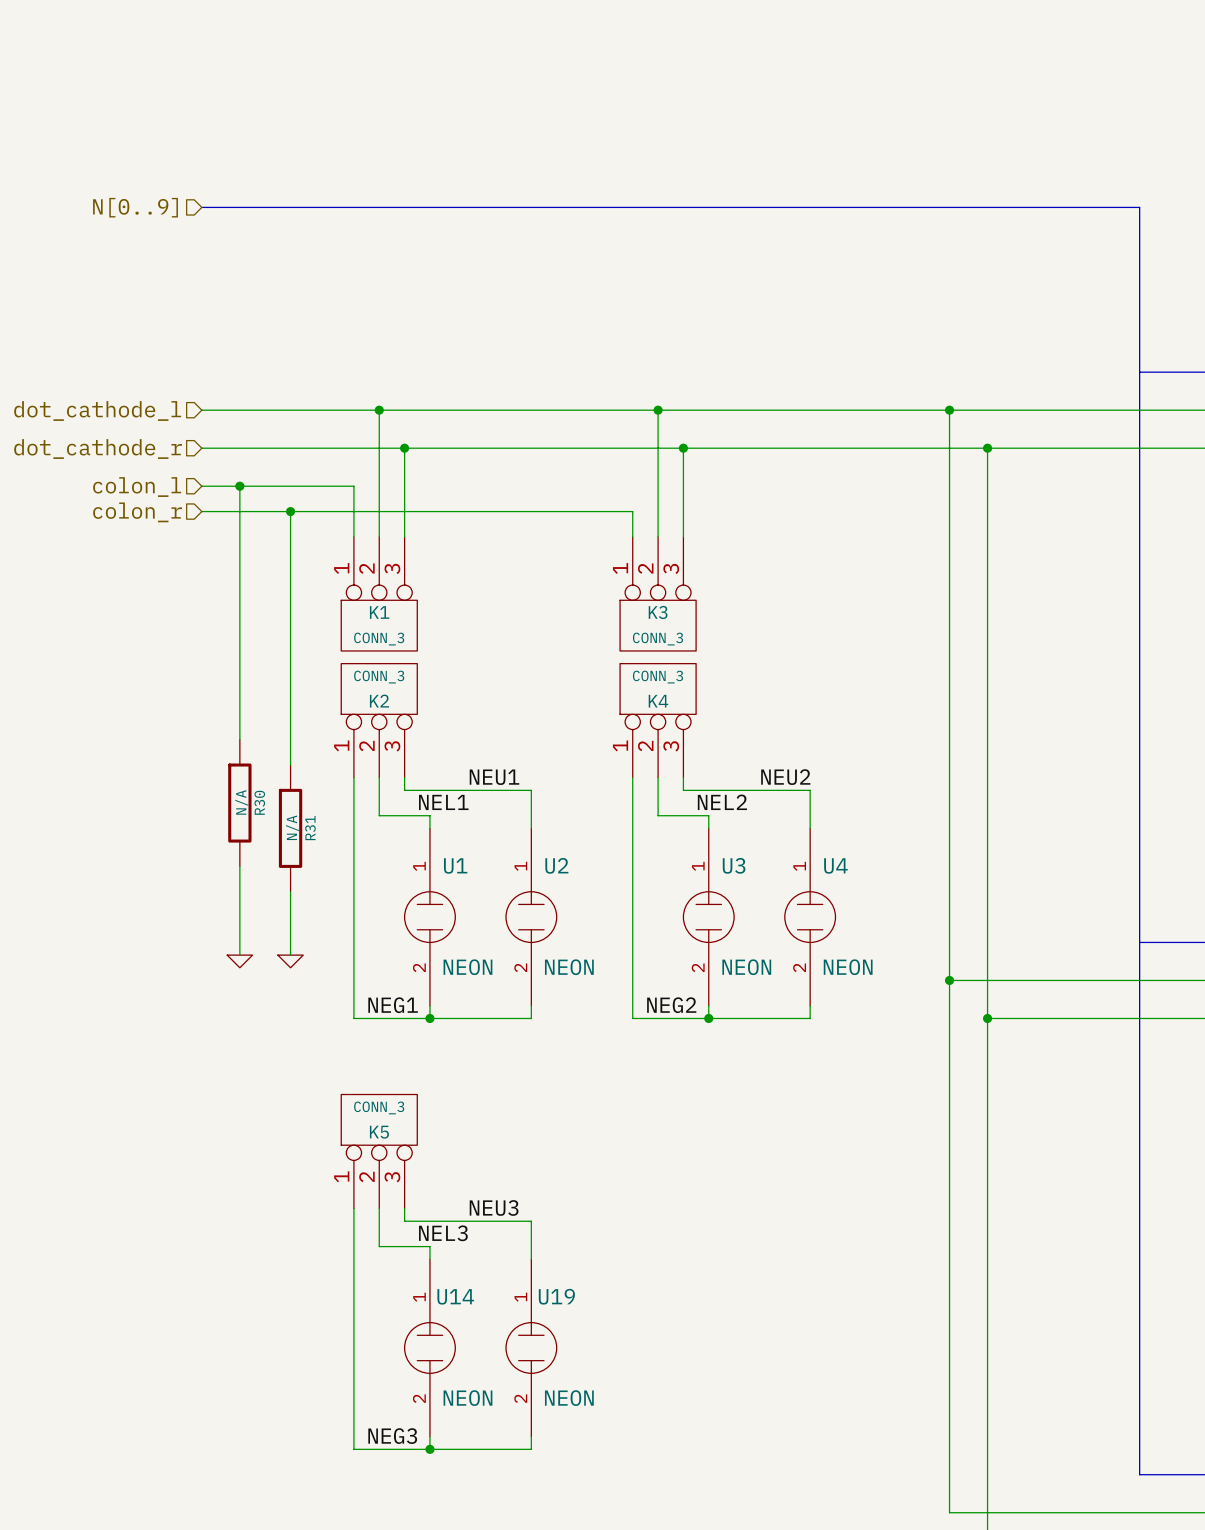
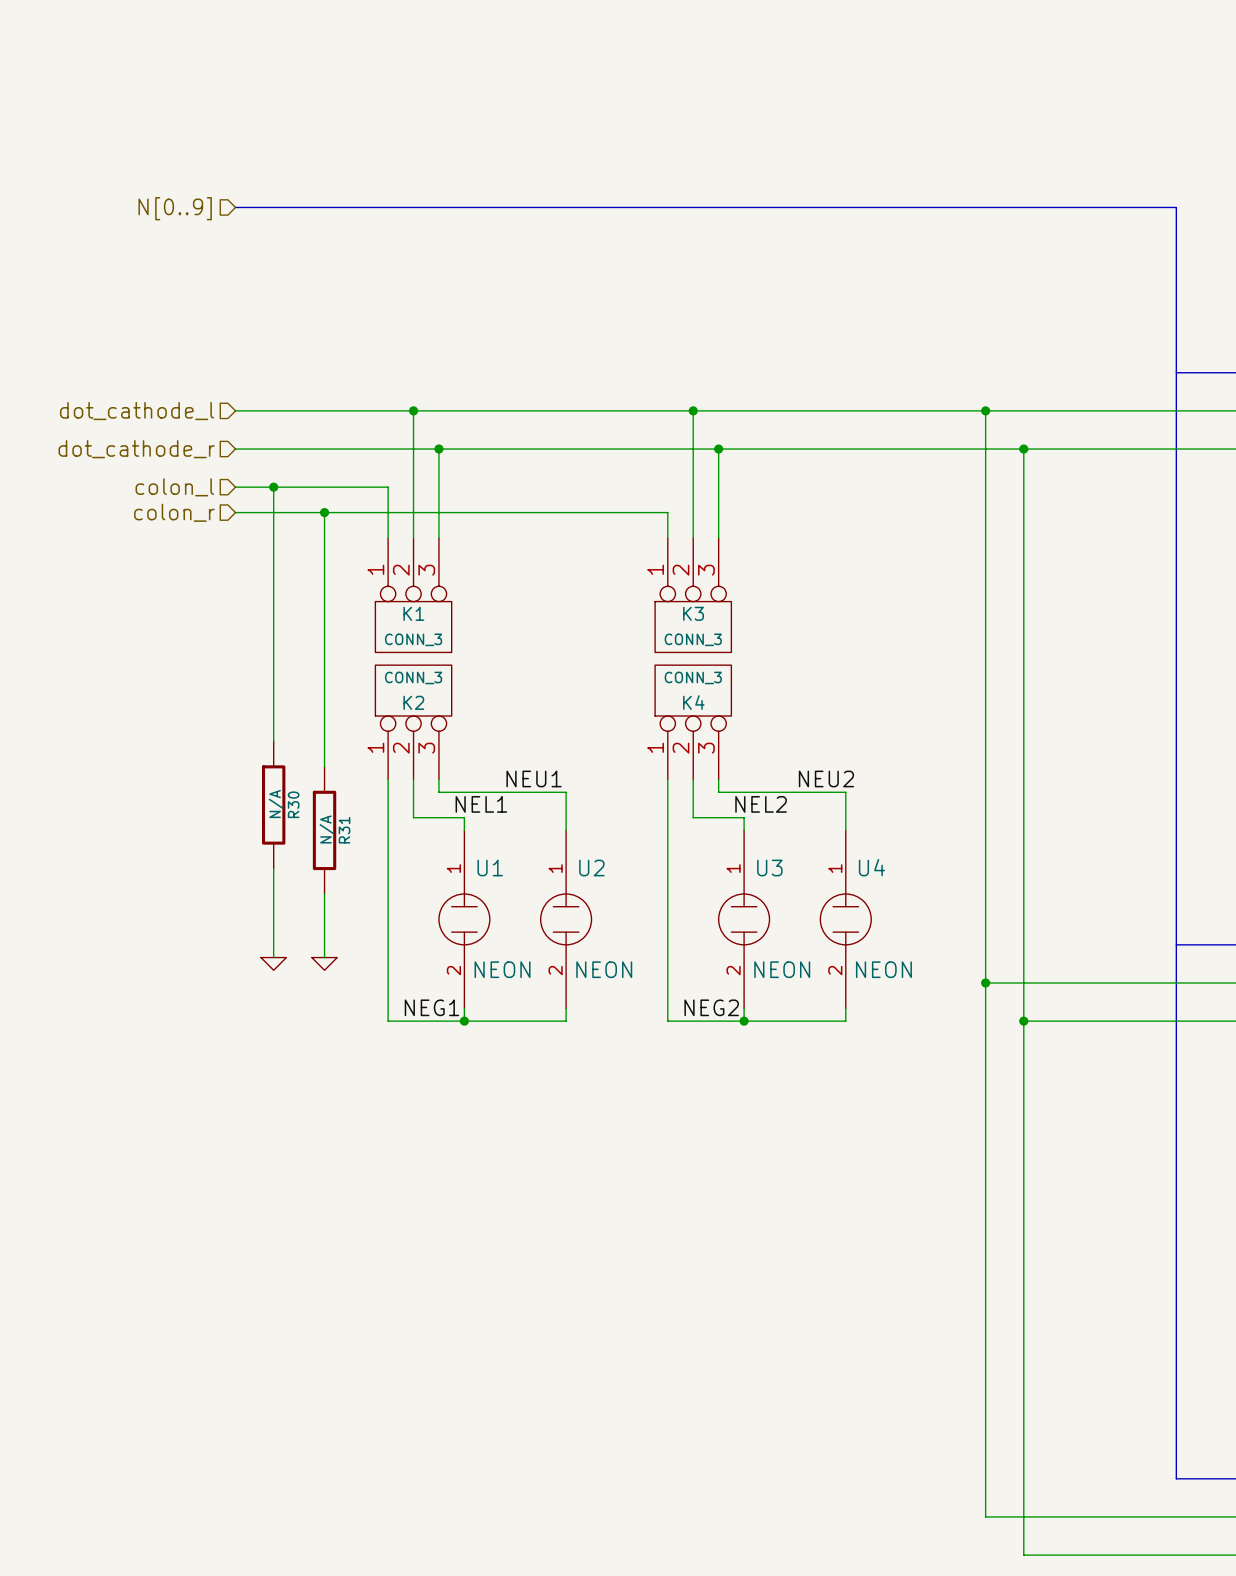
K5: CONN_3 (379, 1151) -> none
label: NEU3 (494, 1207) -> none
wire: (353, 1208) (353, 1449) (531, 1449) (531, 1436) -> none
wire: (379, 1208) (379, 1246) (429, 1246) (429, 1259) -> none
wire: (404, 1208) (404, 1221) (531, 1221) (531, 1259) -> none
label: NEL3 (443, 1233) -> none
U14: NEON (429, 1347) -> none
U19: NEON (531, 1347) -> none
label: NEG3 (392, 1436) -> none
wire: (429, 1436) (429, 1449) -> none
junction: (429, 1449) -> none

